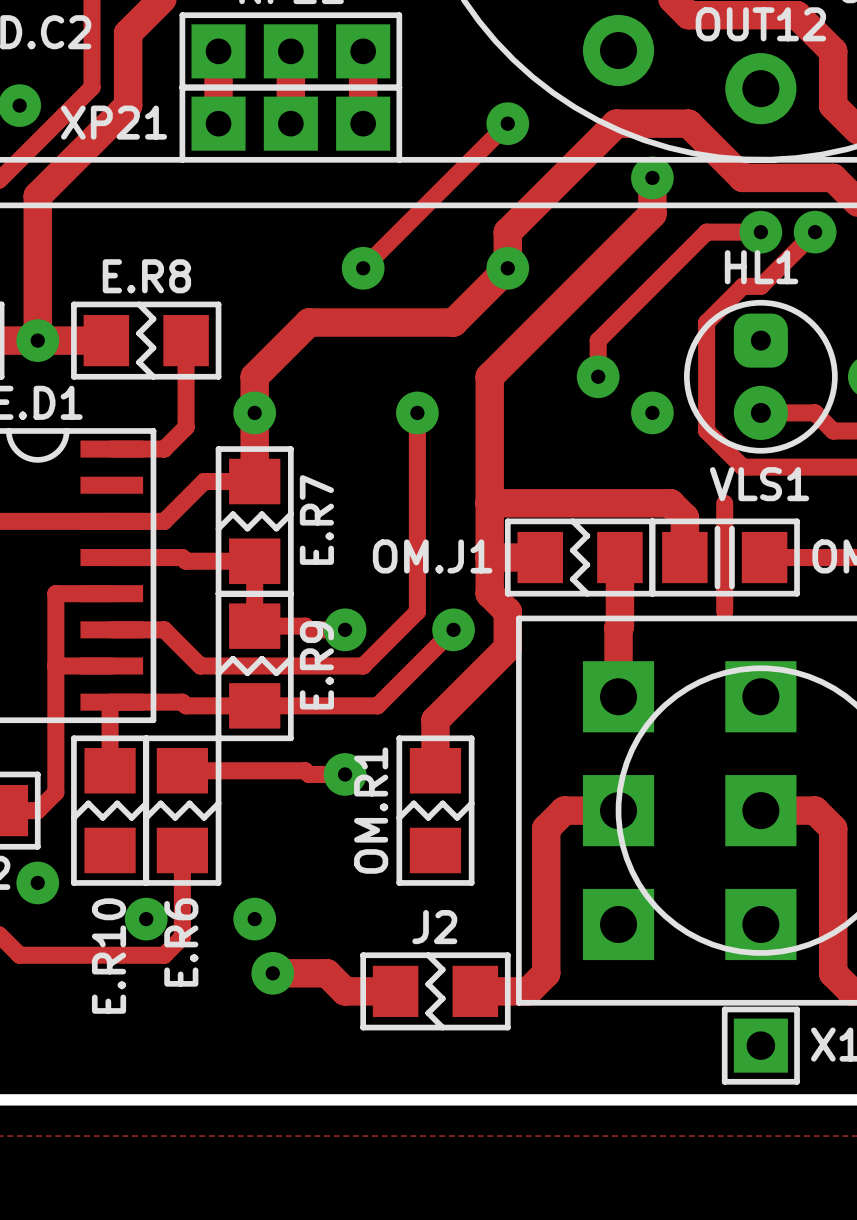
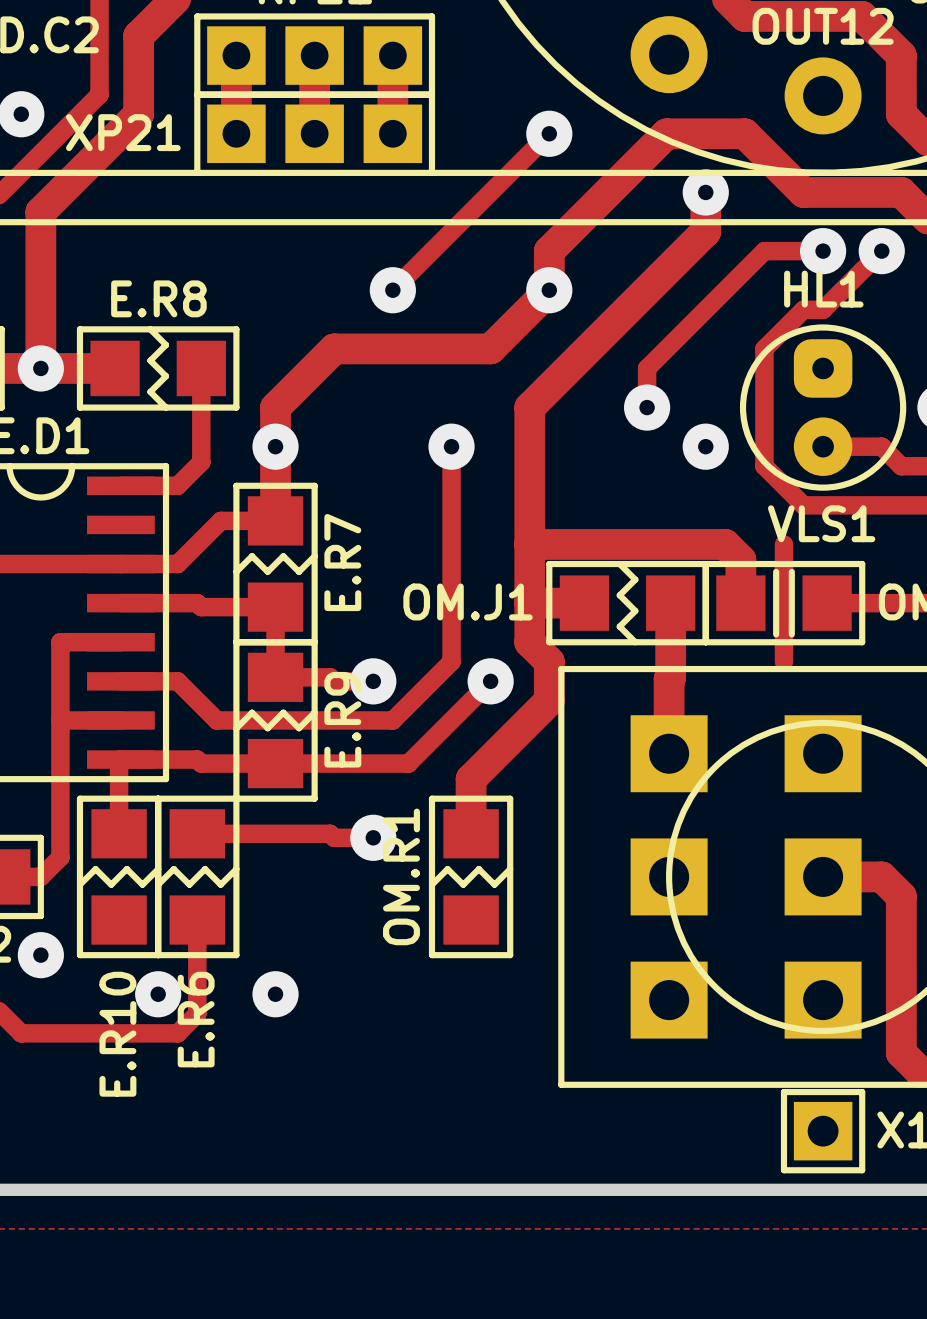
track: (618, 810) (564, 810) (546, 828) (546, 973) (528, 991) (475, 991) -> none
track: (272, 973) (327, 973) (345, 991) (395, 991) -> none
via: (272, 973) -> none
J2: (435, 991) -> none

